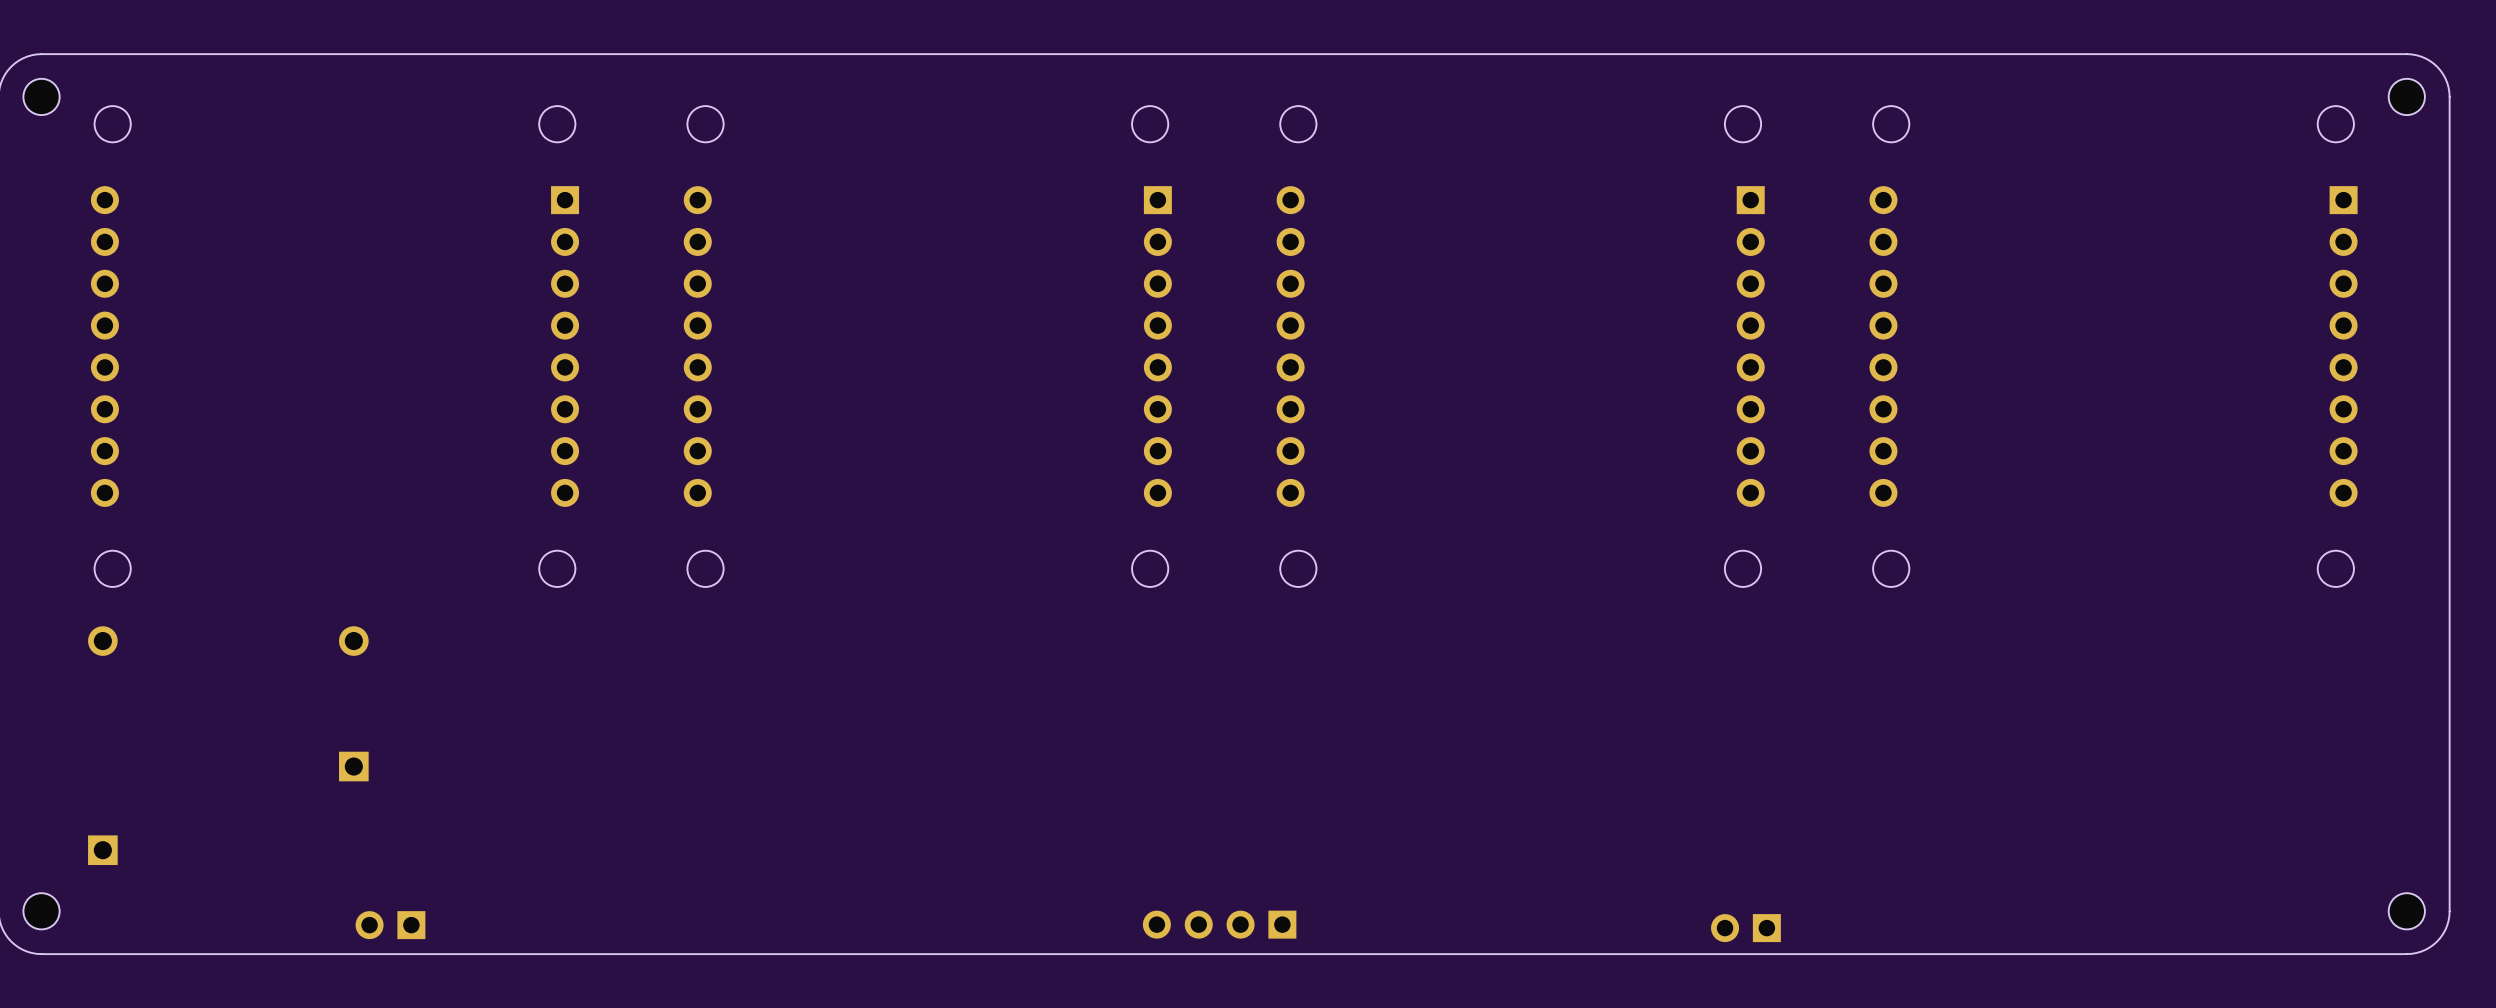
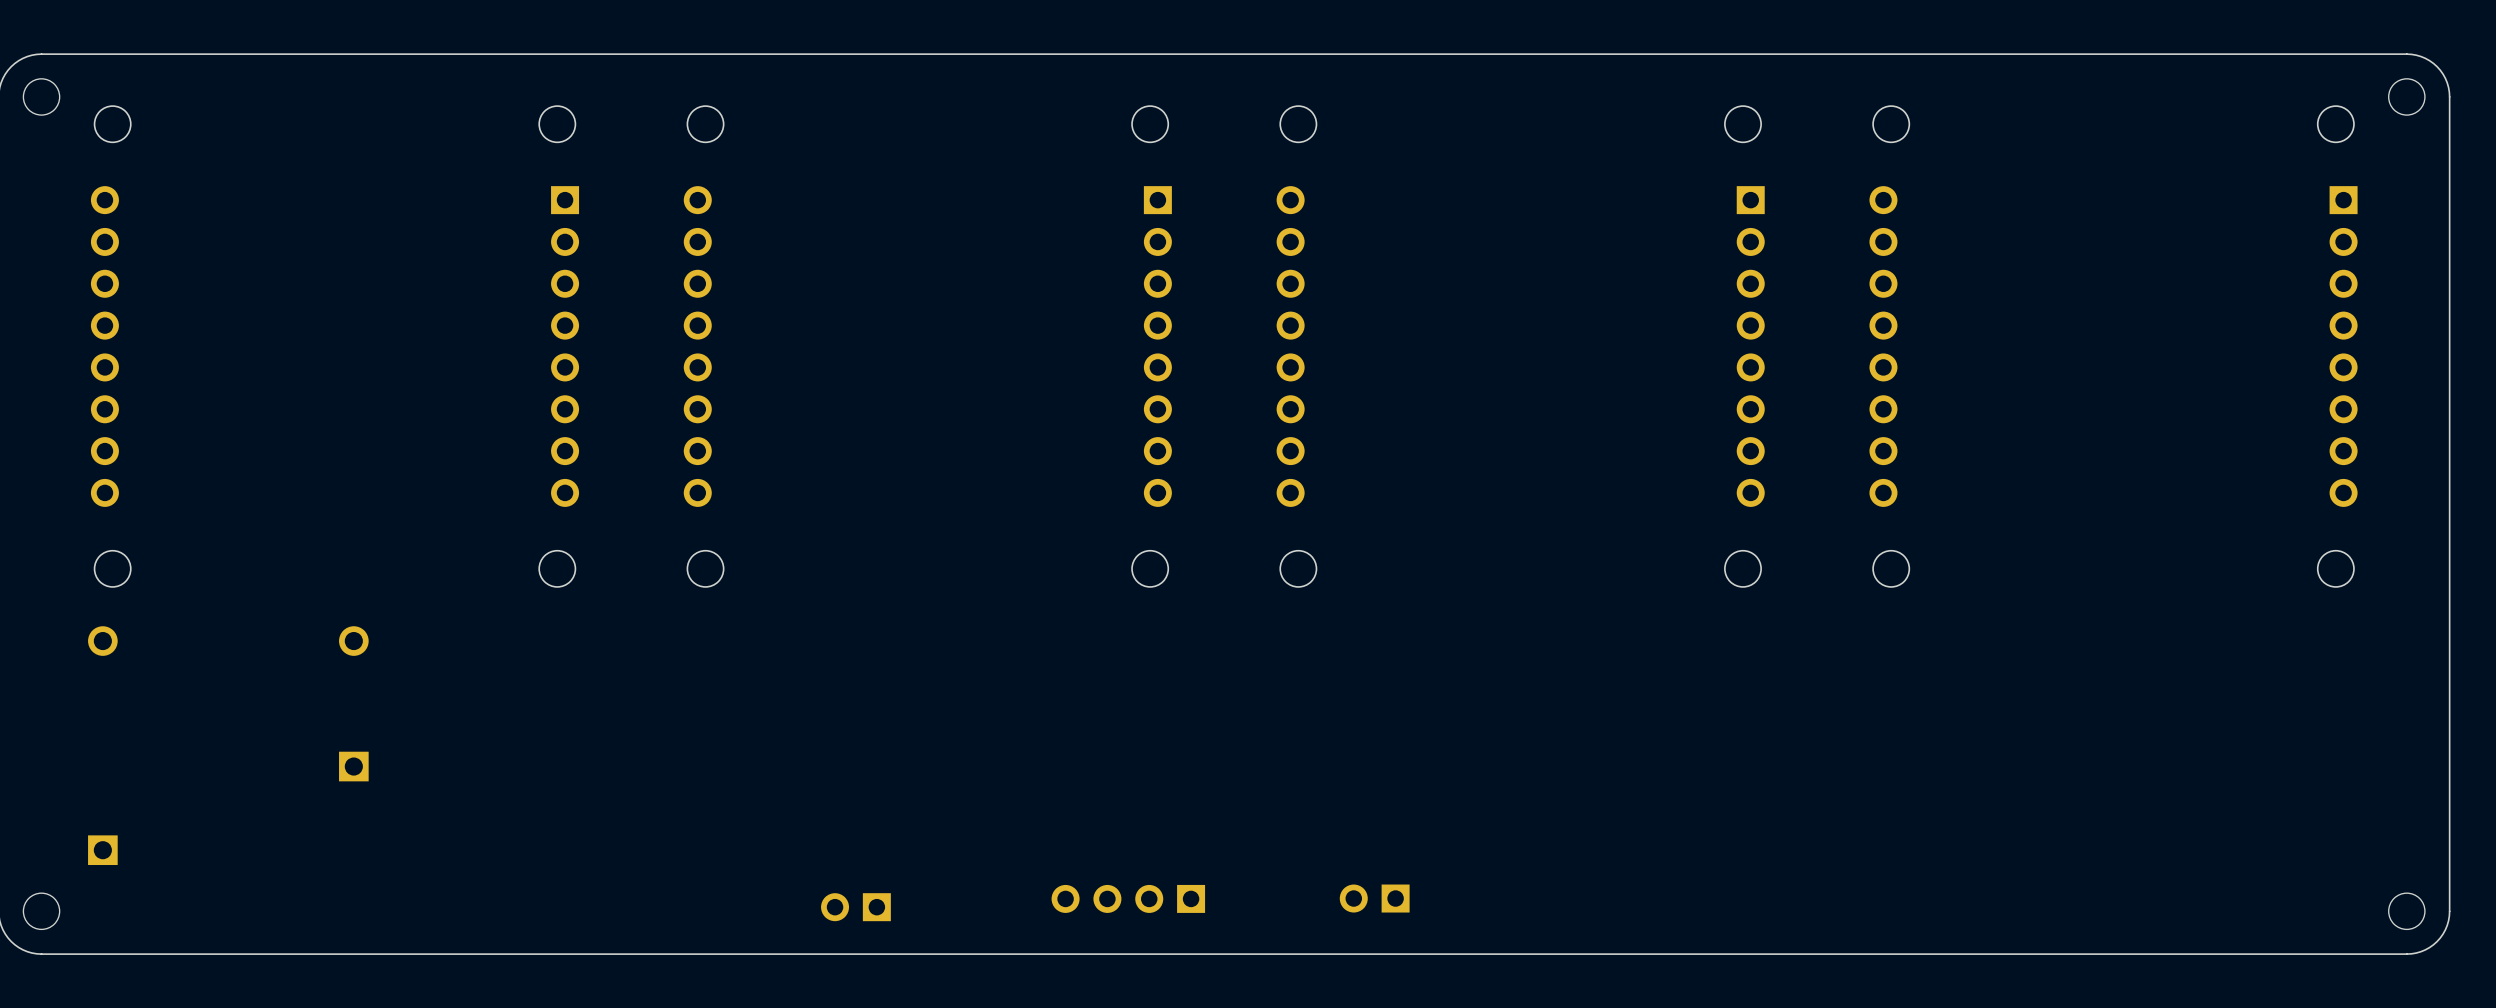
part: none -> (855, 907)
part position: (1219, 924) -> (1128, 898)
part: (390, 925) -> none
part position: (1745, 928) -> (1374, 898)

